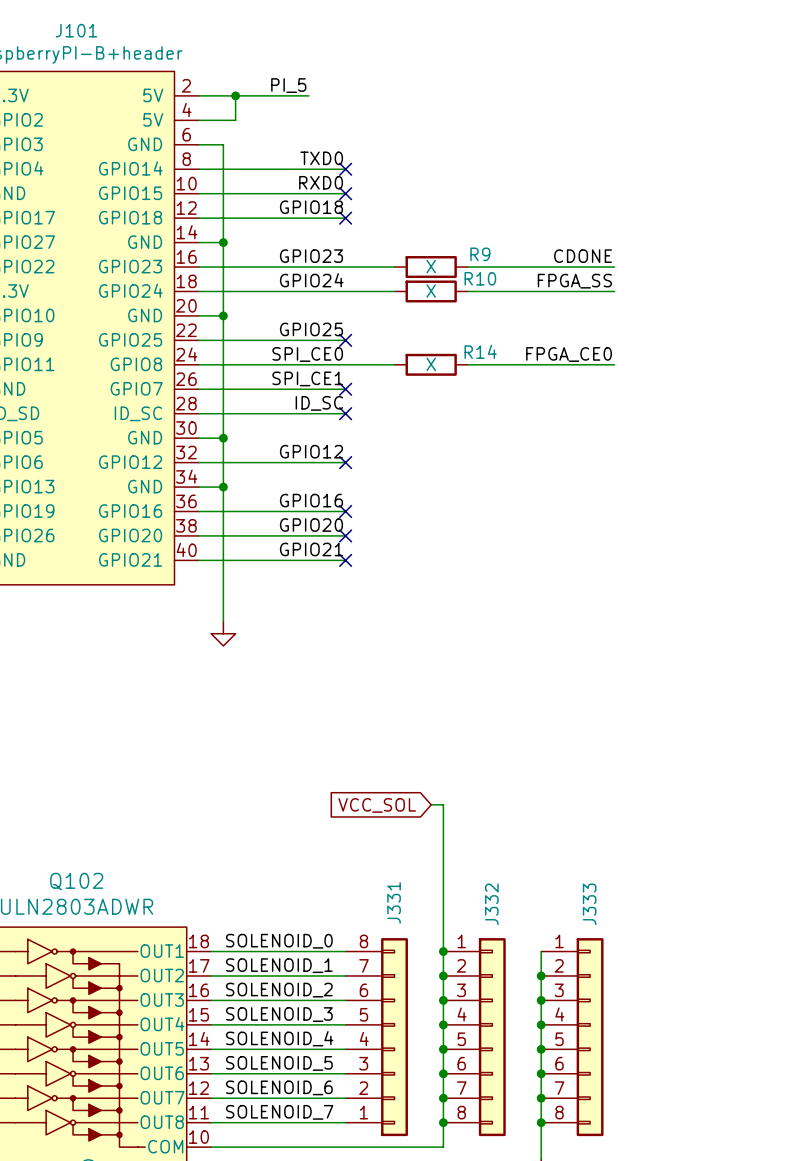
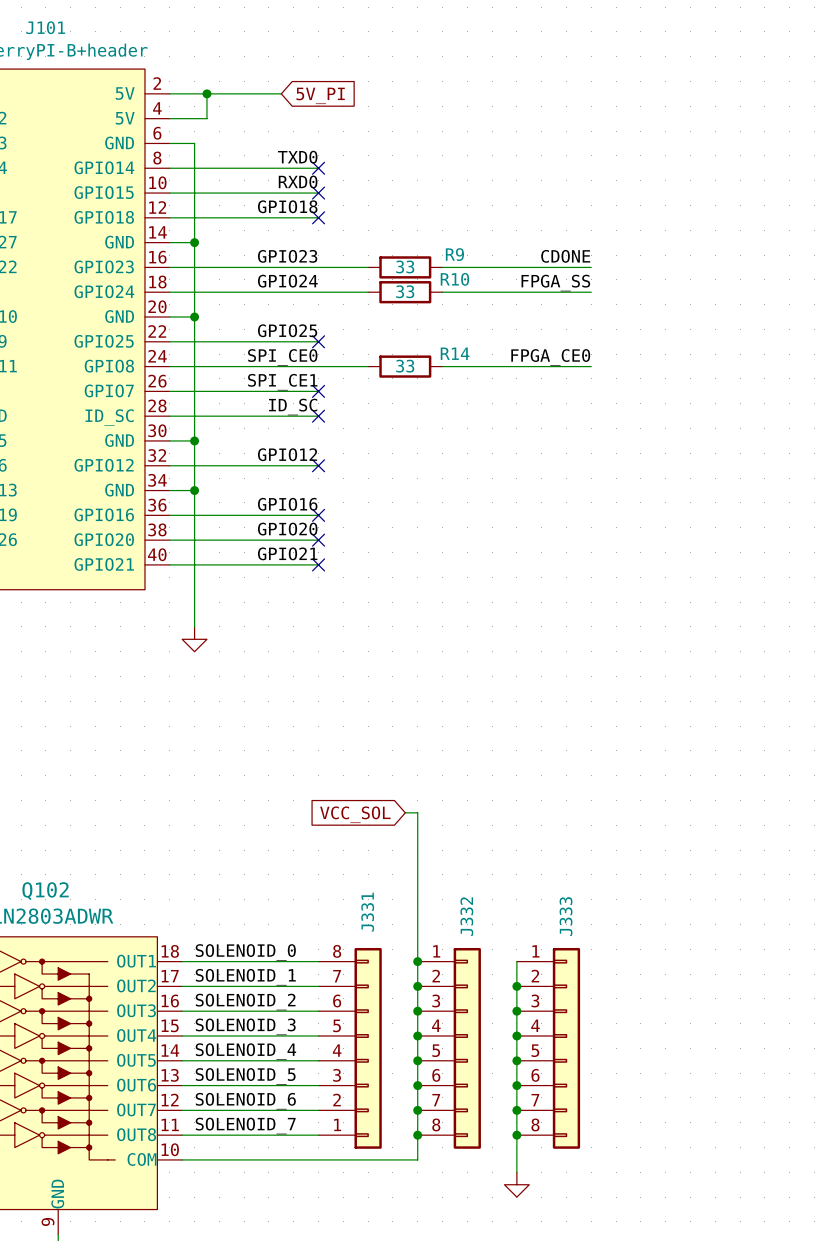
label: PI_5 (288, 85) -> none
global label: none -> 5V_PI (320, 95)
R9 value: X (431, 266) -> 33 (405, 266)
R10 value: X (431, 291) -> 33 (405, 291)
R14 value: X (431, 364) -> 33 (405, 366)

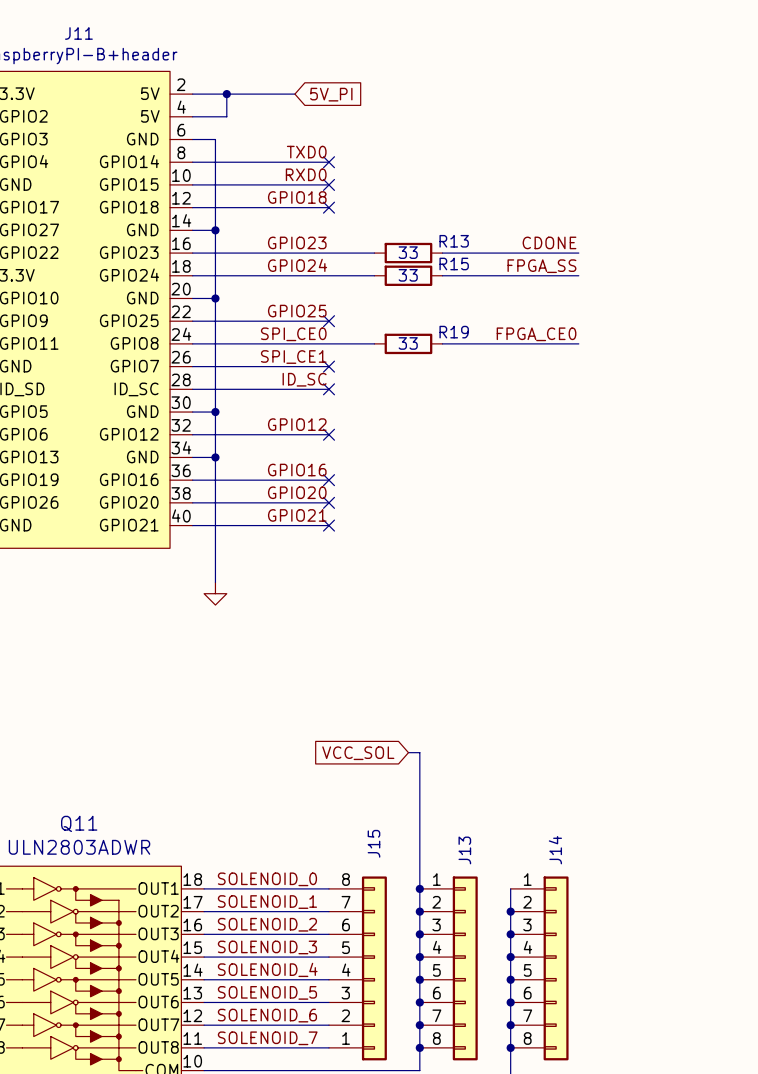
J101 name: J101 (45, 27) -> J11 (78, 33)
R9 name: R9 (454, 254) -> R13 (454, 241)
R10 name: R10 (454, 279) -> R15 (454, 263)
R14 name: R14 (455, 353) -> R19 (454, 332)
Q102 name: Q102 (45, 891) -> Q11 (79, 823)
J331 name: J331 (367, 912) -> J15 (373, 843)
J332 name: J332 (466, 916) -> J13 (464, 850)
J333 name: J333 (566, 916) -> J14 (555, 850)

